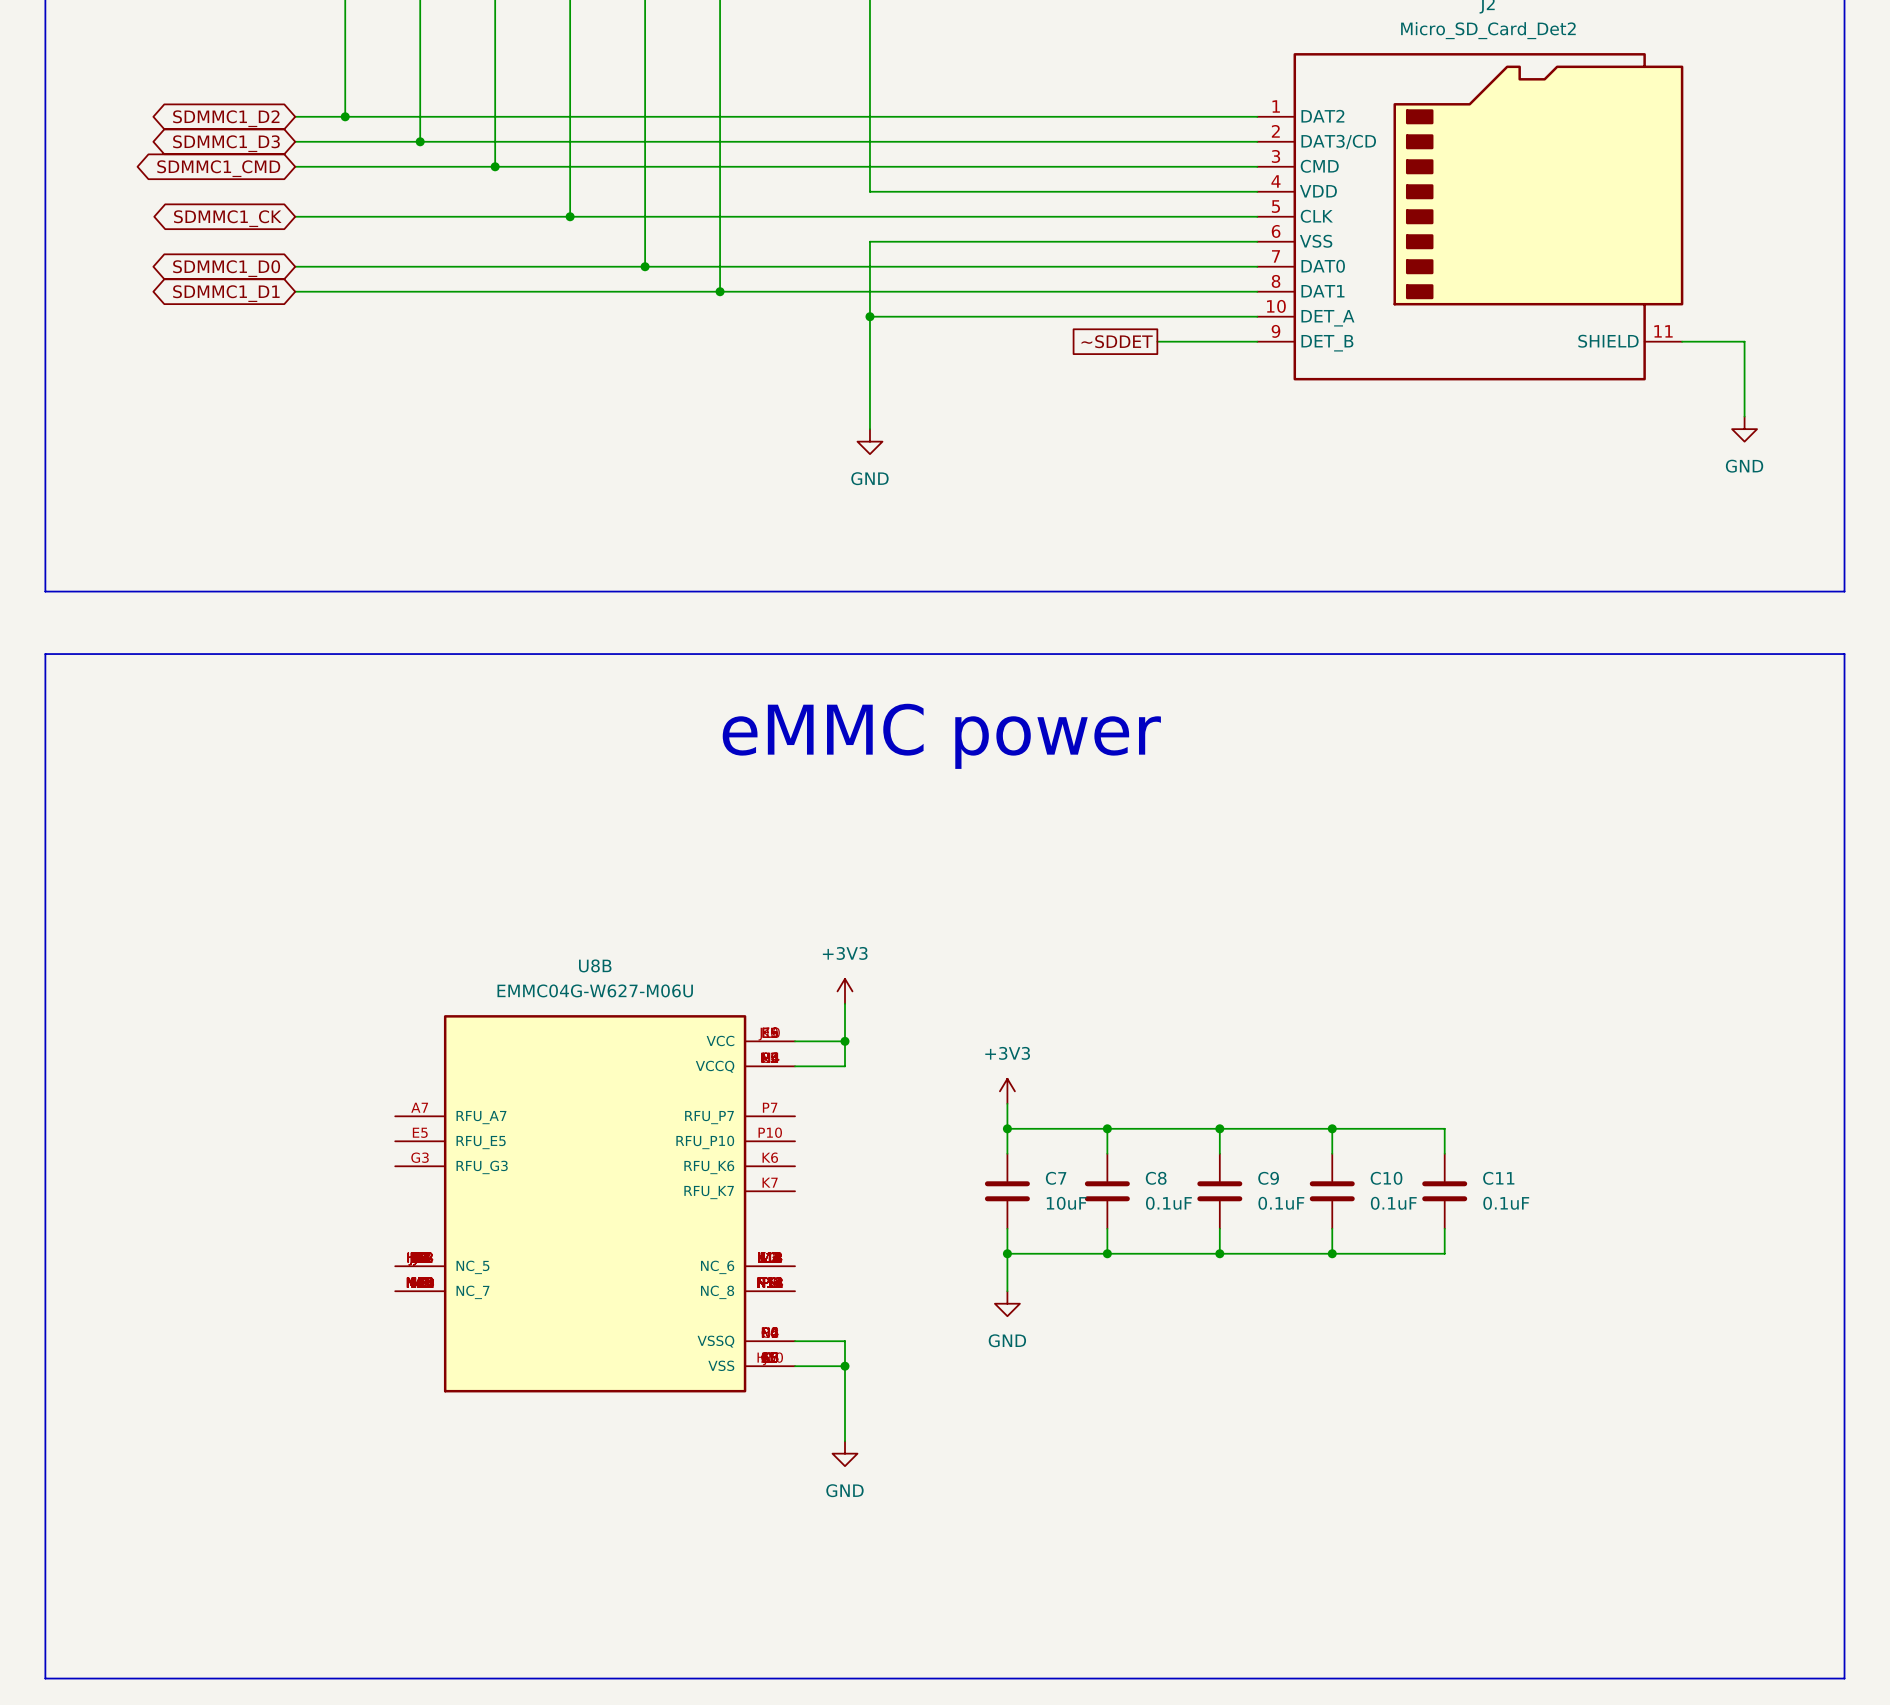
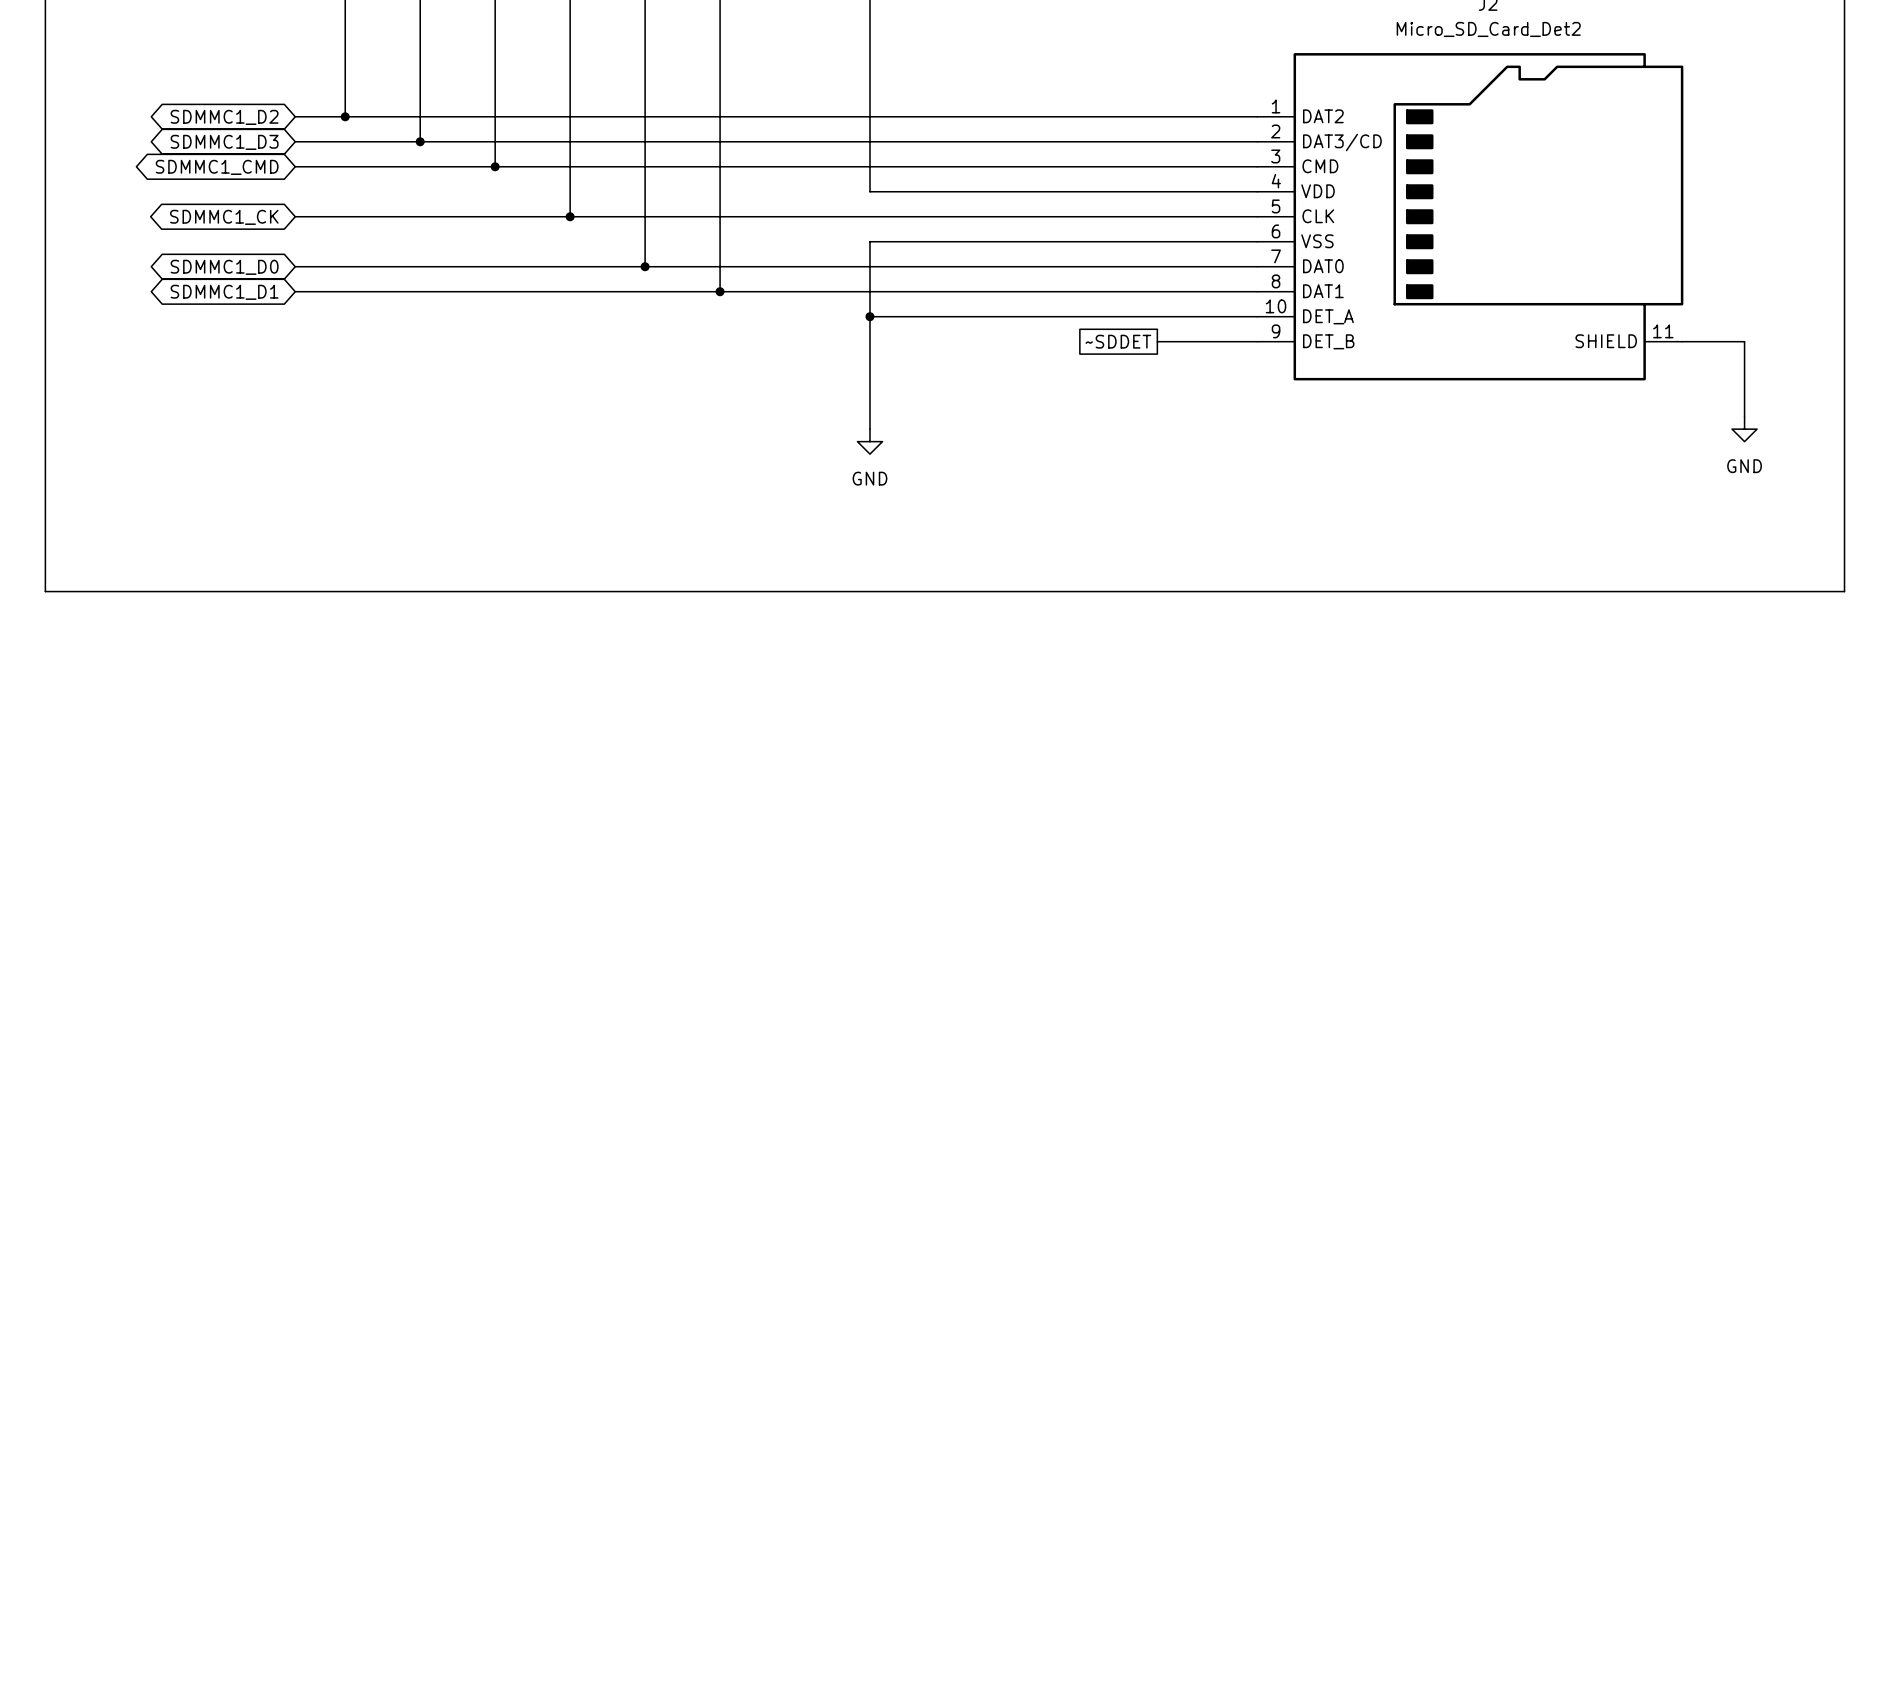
line: (45, 654) (1844, 654) (1844, 1678) (45, 1678) (45, 654) -> none
text: eMMC power (941, 736) -> none
power symbol: +3V3 (845, 991) -> none
wire: (845, 1003) (845, 1066) (795, 1066) -> none
wire: (795, 1041) (845, 1041) -> none
junction: (845, 1041) -> none
power symbol: +3V3 (1007, 1091) -> none
wire: (1007, 1103) (1007, 1153) -> none
wire: (1007, 1128) (1444, 1128) (1444, 1153) -> none
junction: (1007, 1128) -> none
wire: (1107, 1128) (1107, 1153) -> none
junction: (1107, 1128) -> none
wire: (1219, 1128) (1219, 1153) -> none
junction: (1219, 1128) -> none
wire: (1332, 1128) (1332, 1153) -> none
junction: (1332, 1128) -> none
C7: 10uF (1007, 1191) -> none
C8: 0.1uF (1107, 1191) -> none
C9: 0.1uF (1219, 1191) -> none
C10: 0.1uF (1332, 1191) -> none
C11: 0.1uF (1444, 1191) -> none
U8B: EMMC04G-W627-M06U (595, 1203) -> none
wire: (1007, 1228) (1007, 1291) -> none
wire: (1107, 1228) (1107, 1253) -> none
wire: (1219, 1228) (1219, 1253) -> none
wire: (1332, 1228) (1332, 1253) -> none
wire: (1444, 1228) (1444, 1253) (1007, 1253) -> none
junction: (1007, 1253) -> none
junction: (1107, 1253) -> none
junction: (1219, 1253) -> none
junction: (1332, 1253) -> none
power symbol: GND (1007, 1303) -> none
wire: (795, 1341) (845, 1341) (845, 1441) -> none
wire: (795, 1366) (845, 1366) -> none
junction: (845, 1366) -> none
power symbol: GND (845, 1453) -> none

